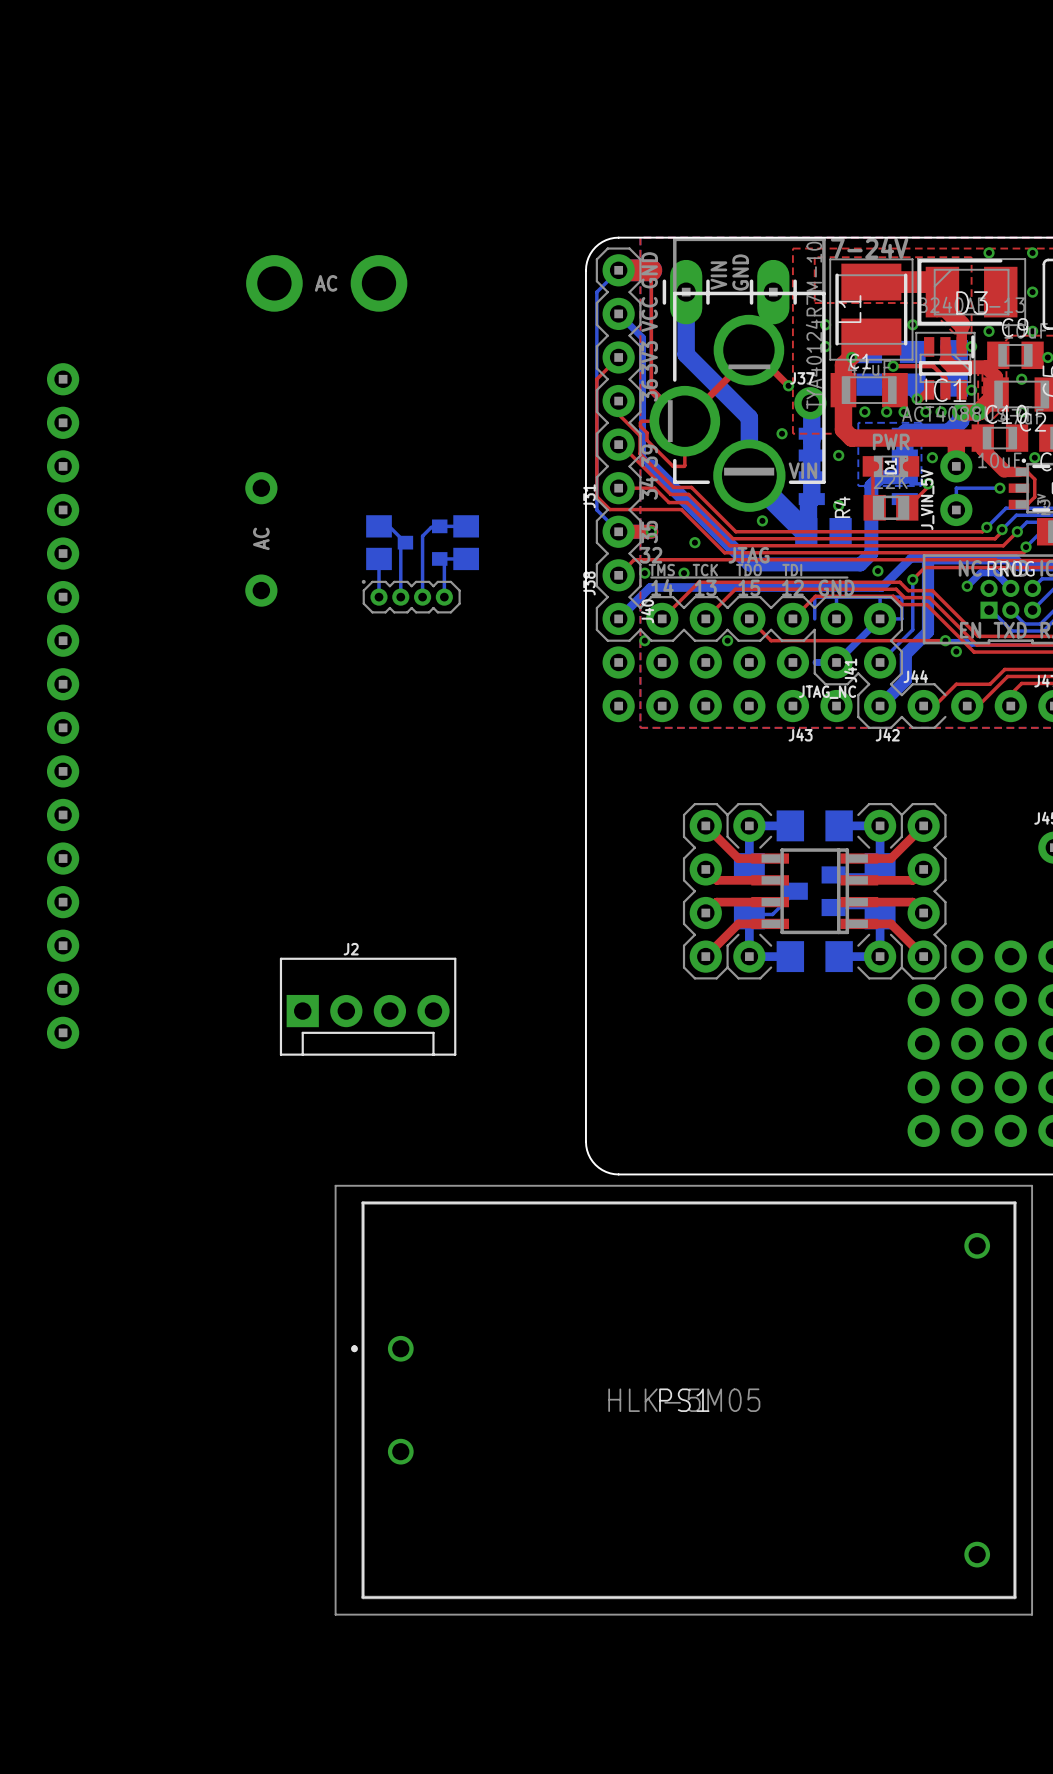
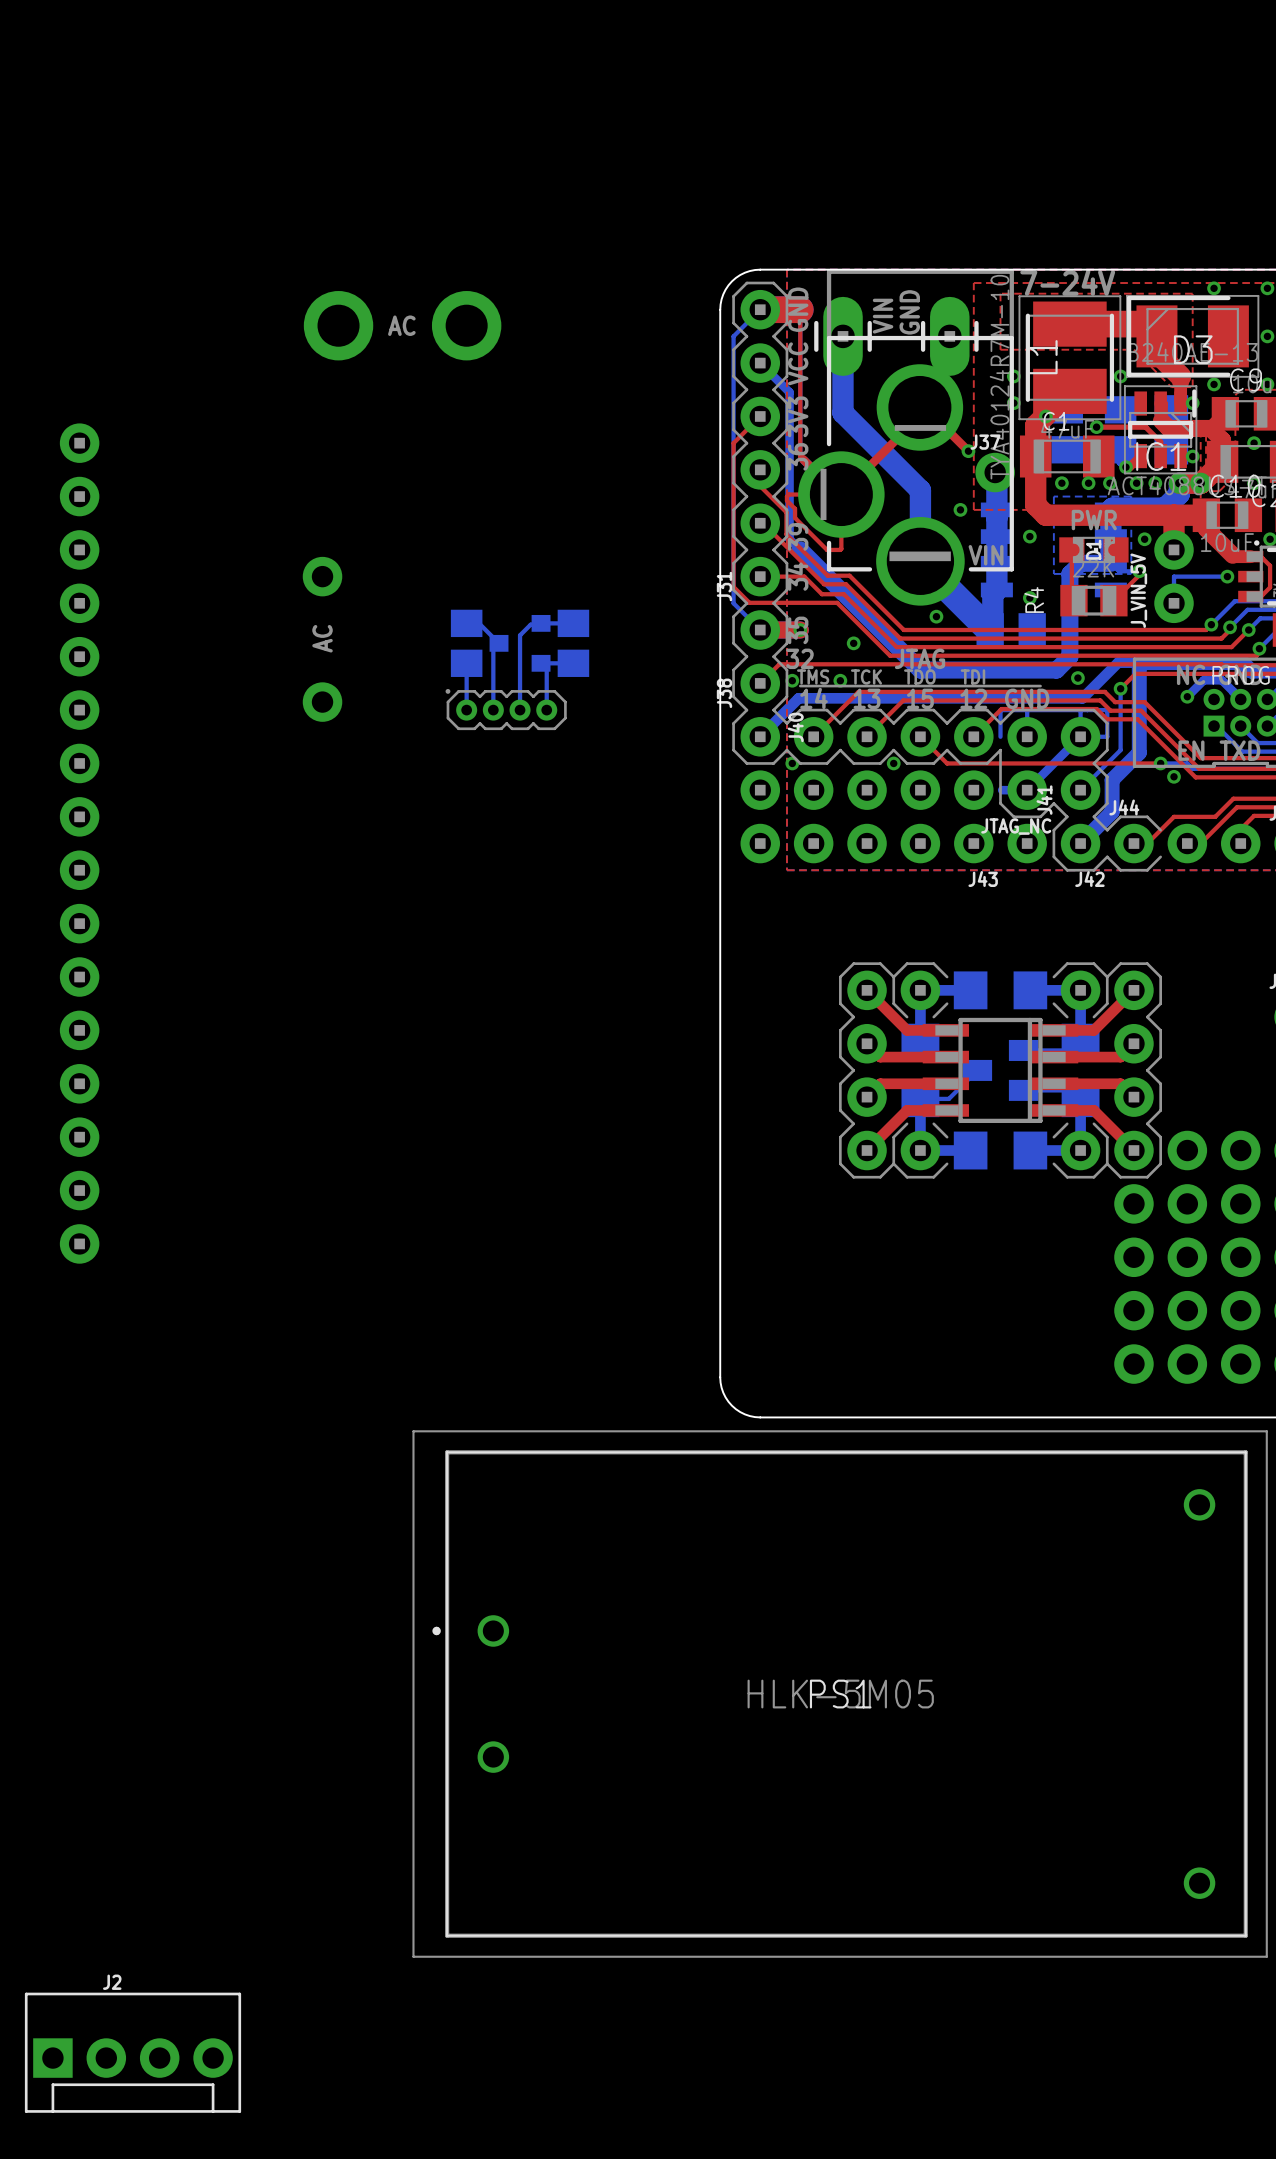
J2 position: (368, 1006) -> (133, 2052)

